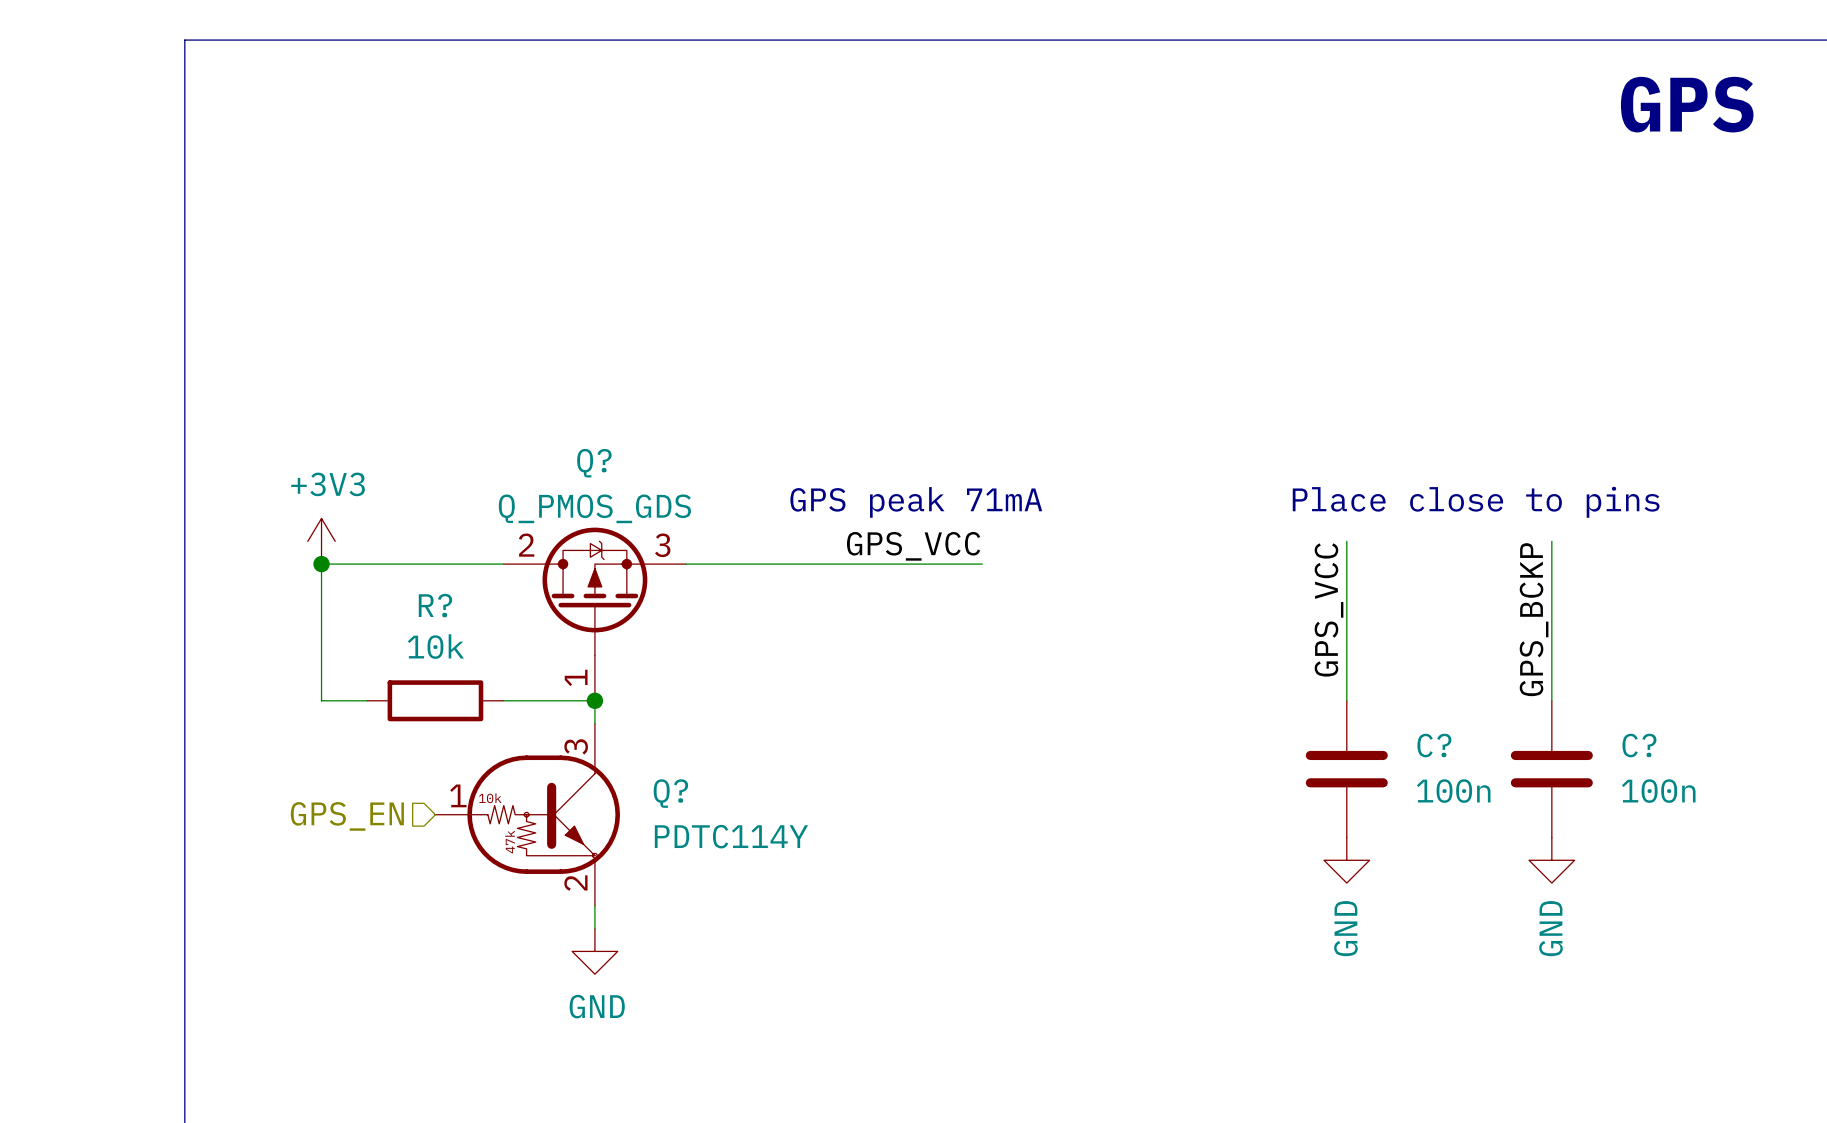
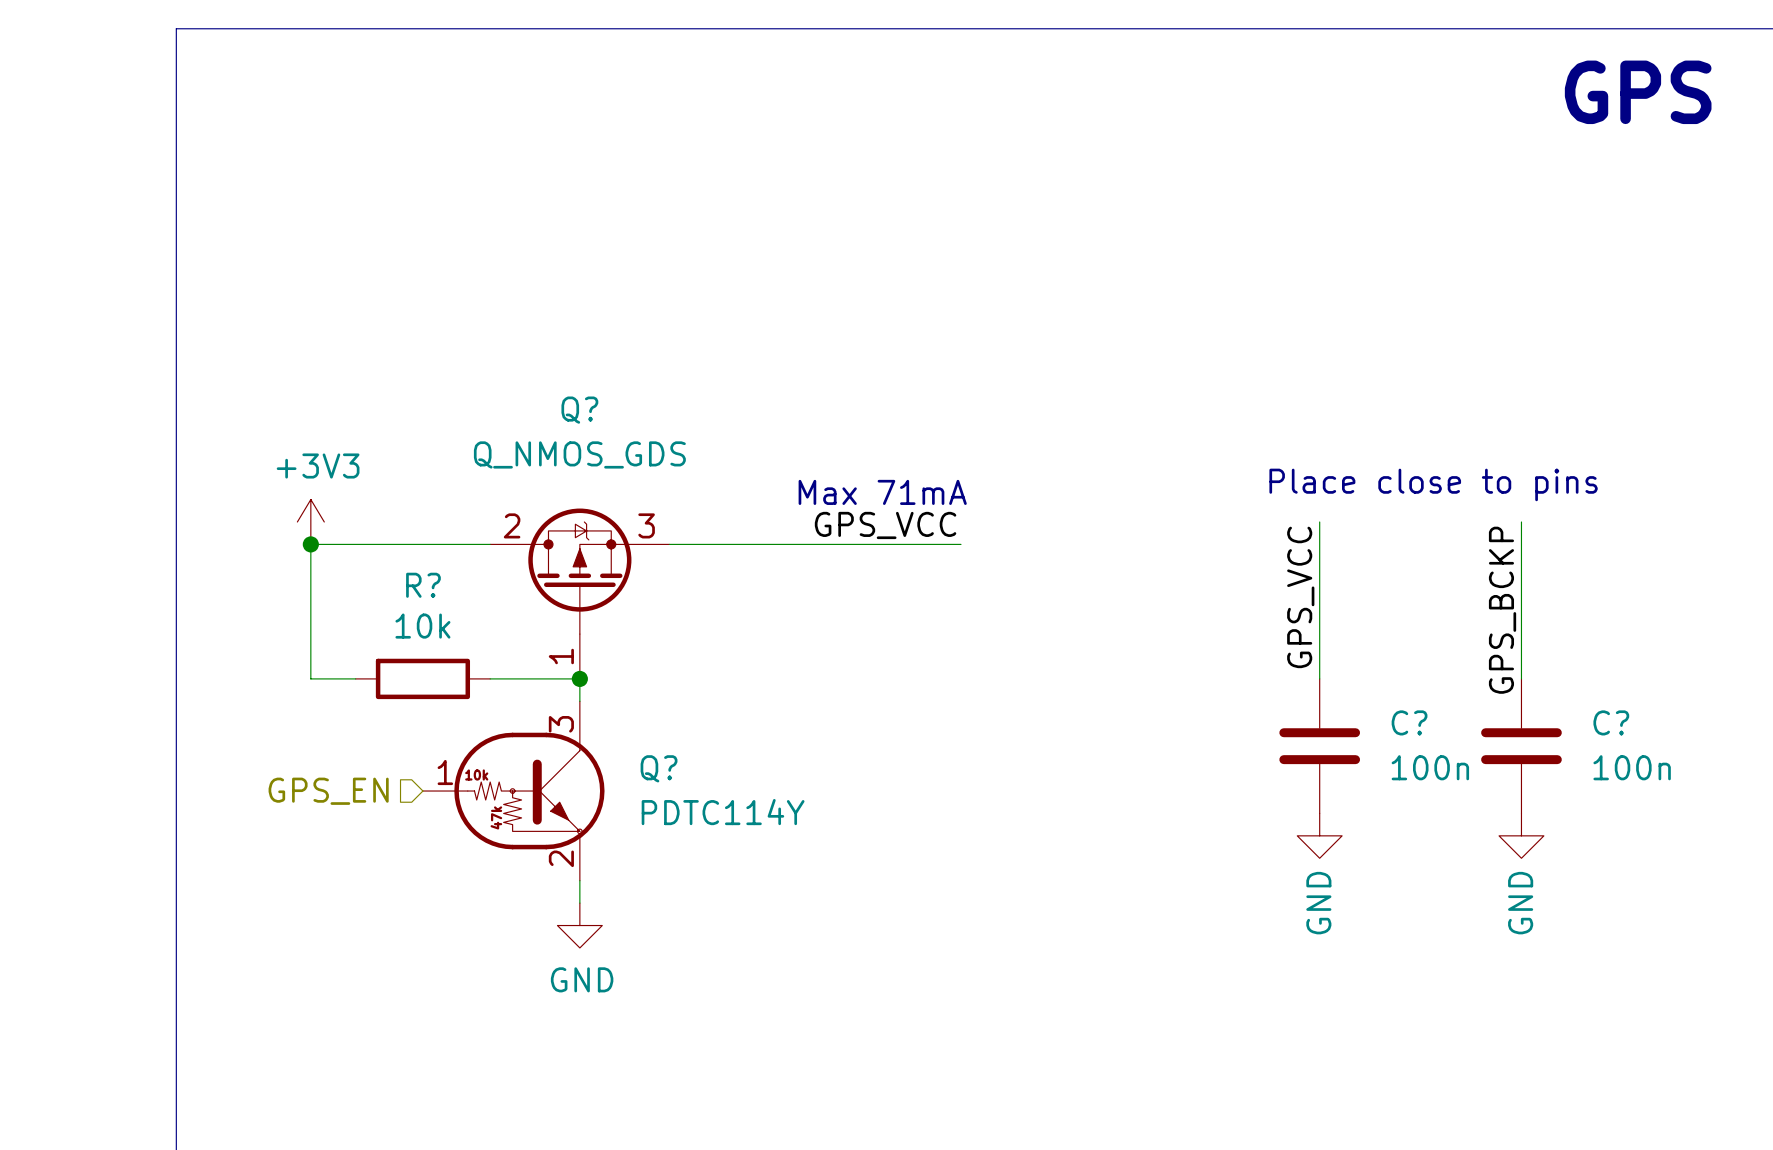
Q? name position: Q? (594, 463) -> Q? (579, 410)
text: GPS peak 71mA (916, 502) -> none
Q? value: Q_PMOS_GDS (594, 508) -> Q_NMOS_GDS (579, 454)
text: none -> Max 71mA (882, 492)

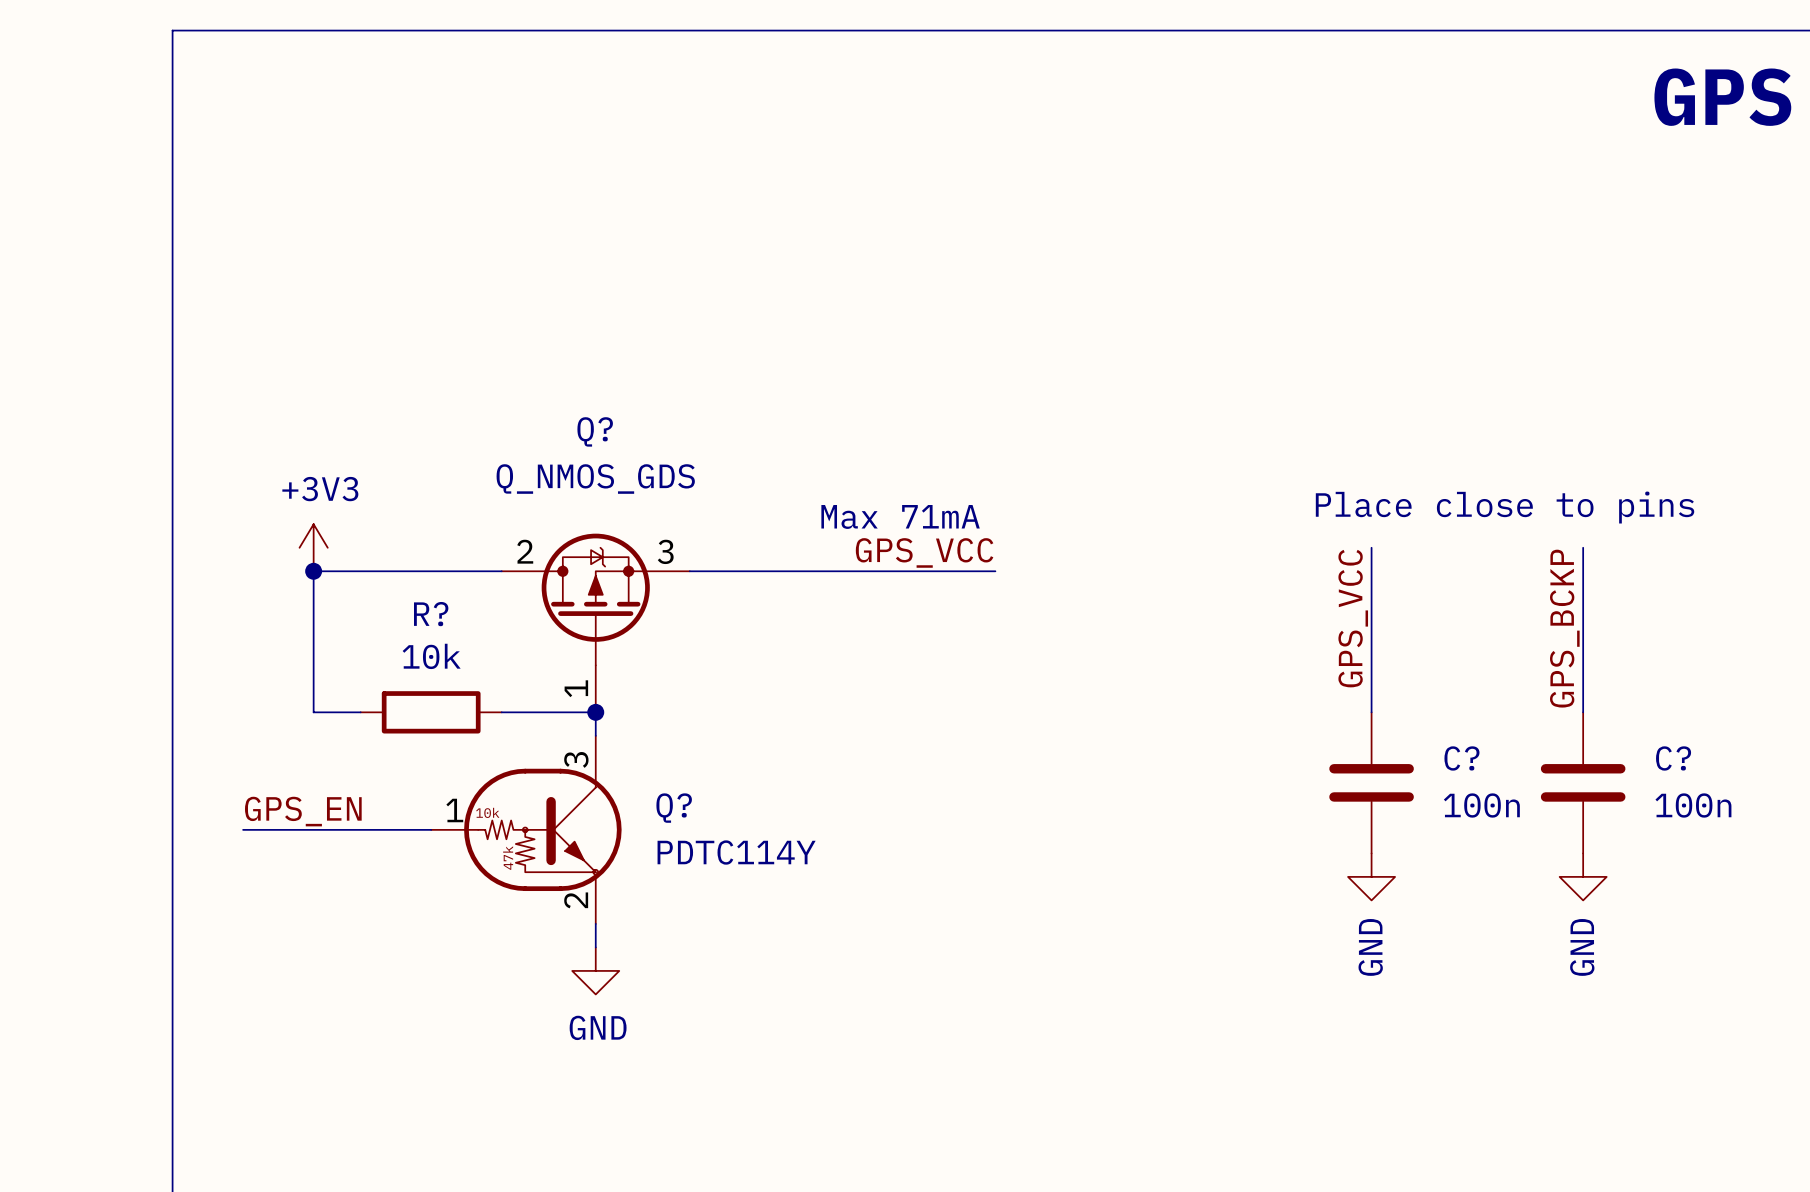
label: none -> GPS_EN (303, 811)
wire: none -> (243, 829) (431, 829)
hierarchical label: GPS_EN (328, 791) -> none

